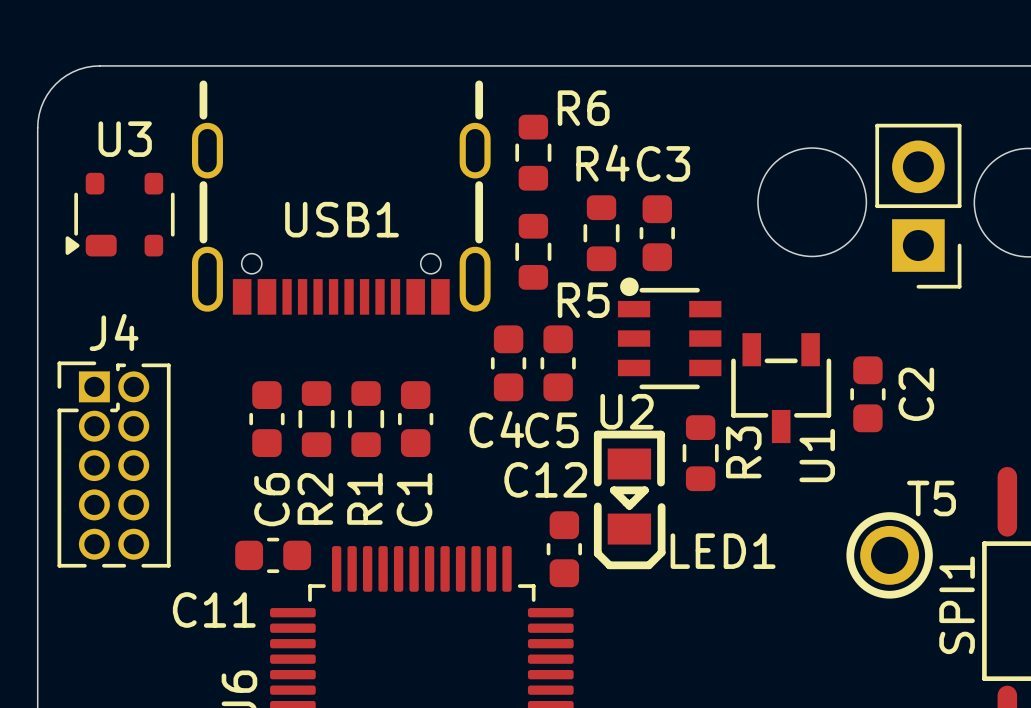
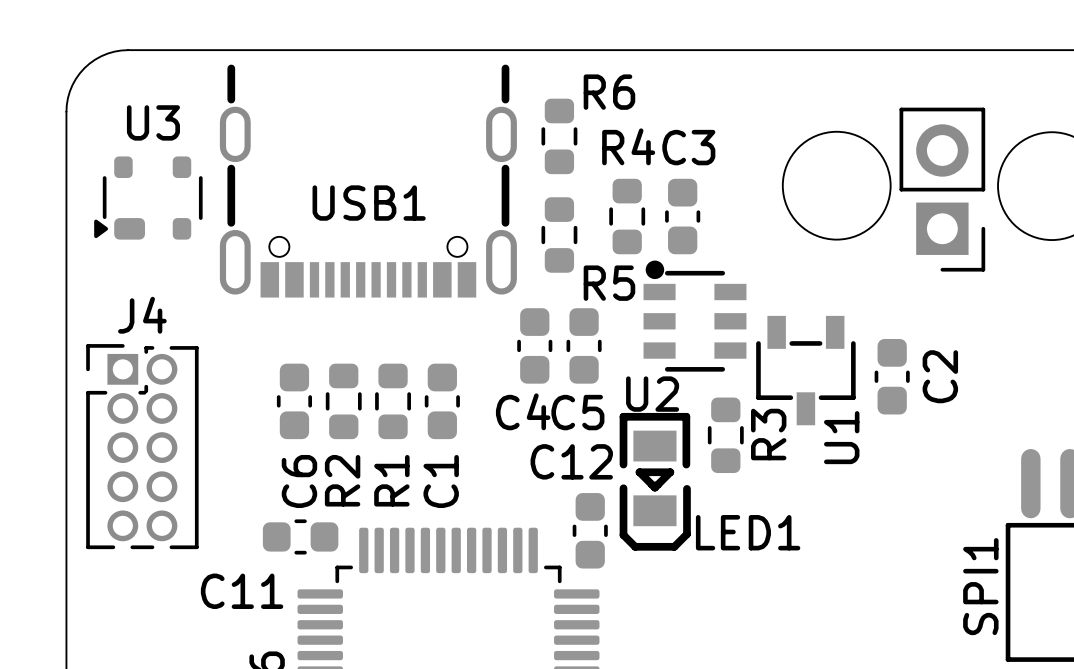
T5: (889, 555) -> none

